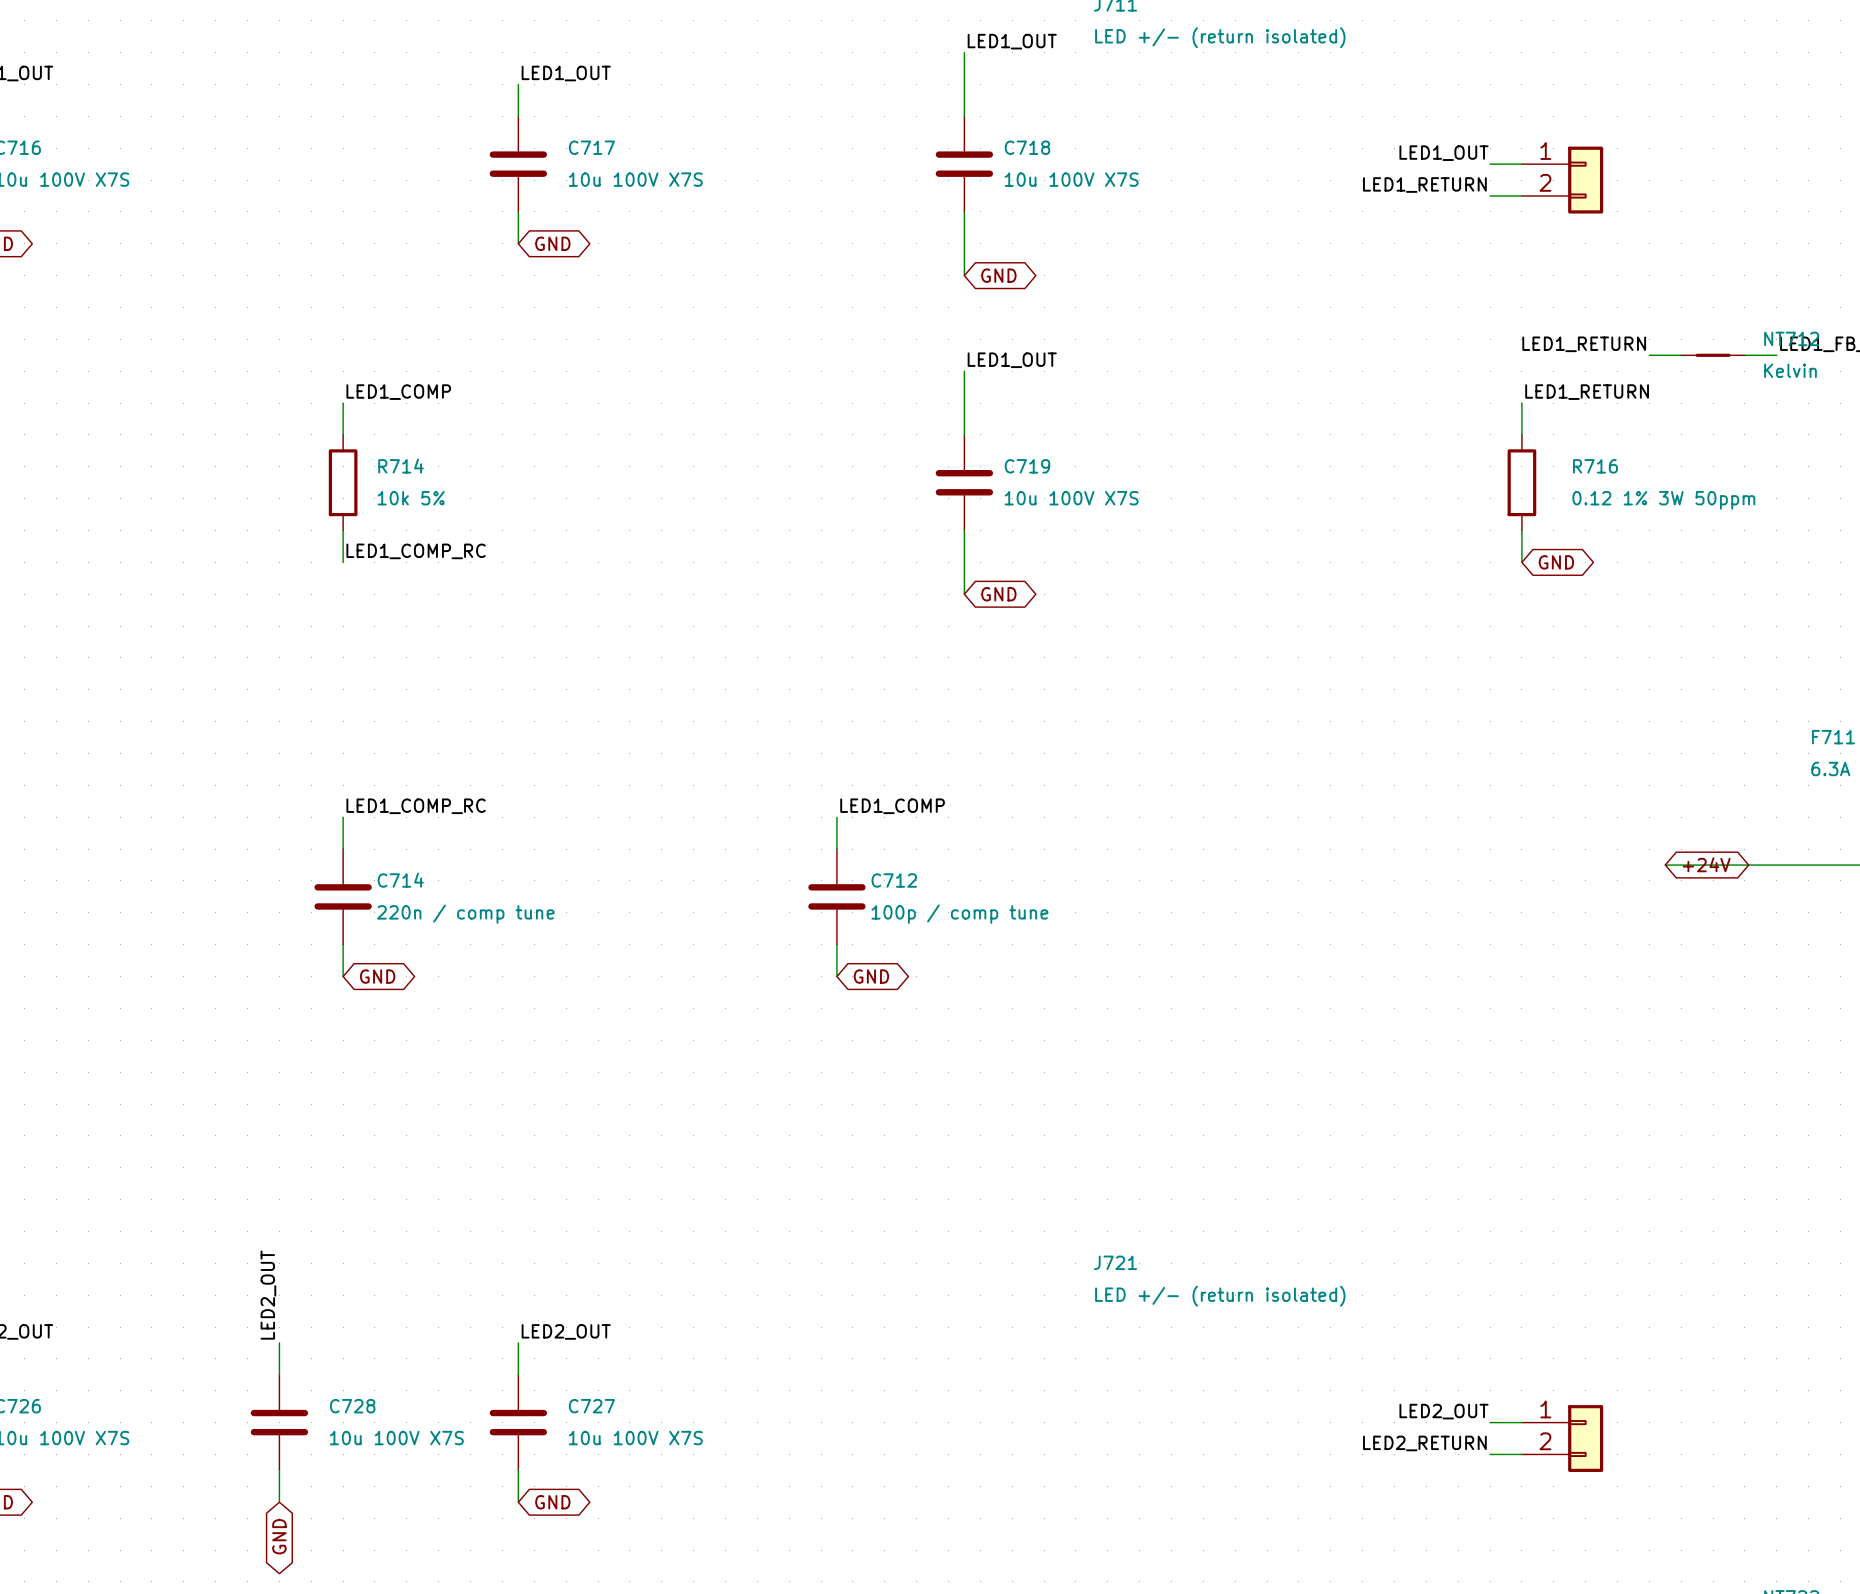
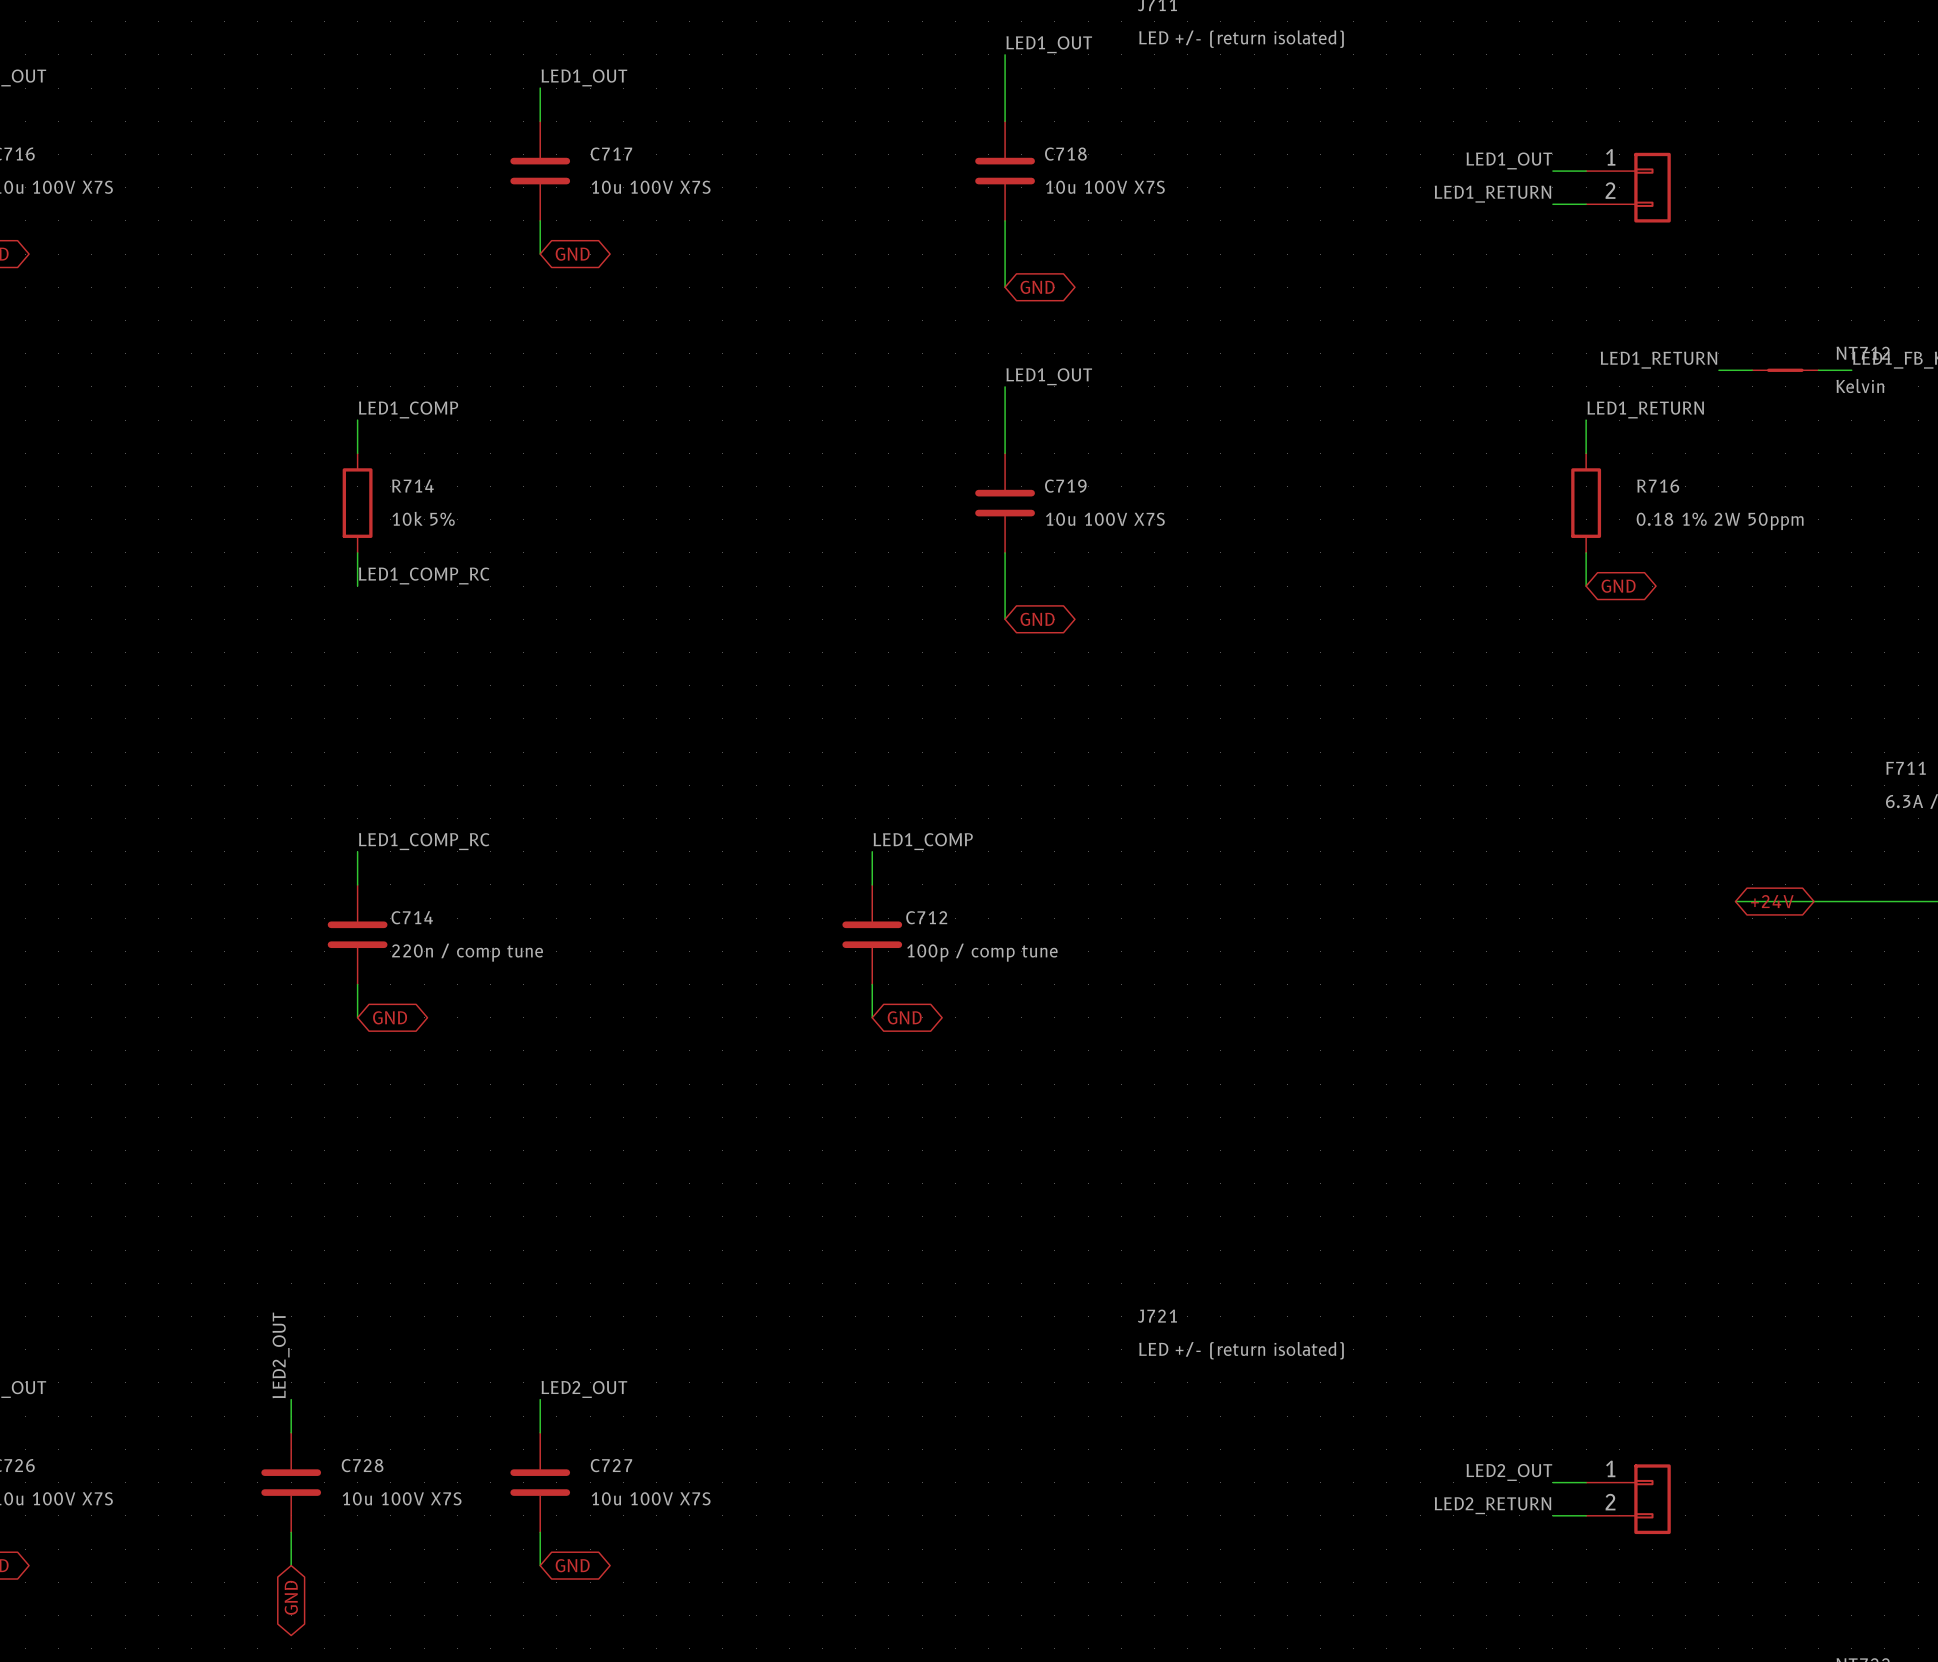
R716 value: 0.12 1% 3W 50ppm (1663, 500) -> 0.18 1% 2W 50ppm (1720, 521)

